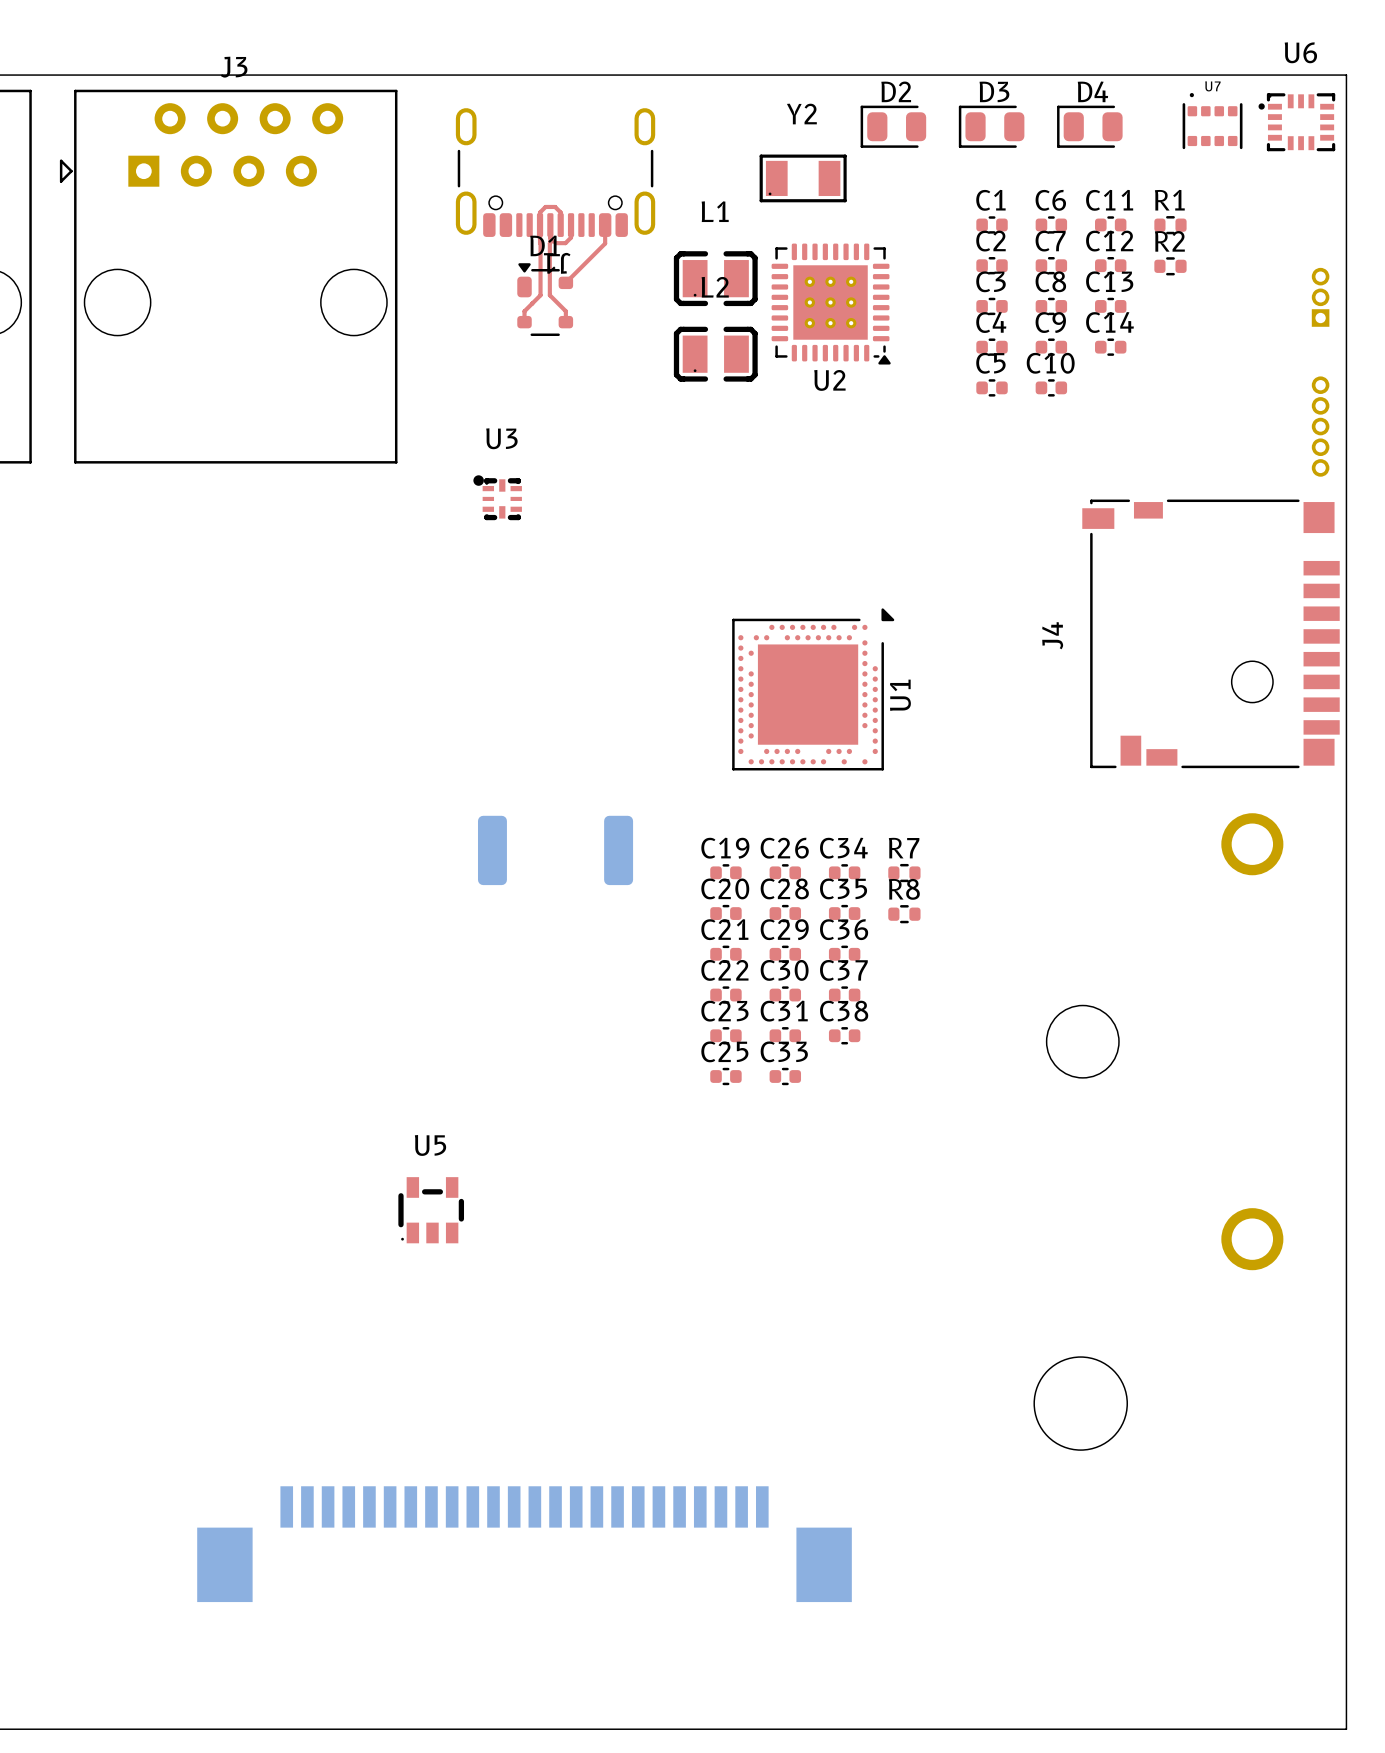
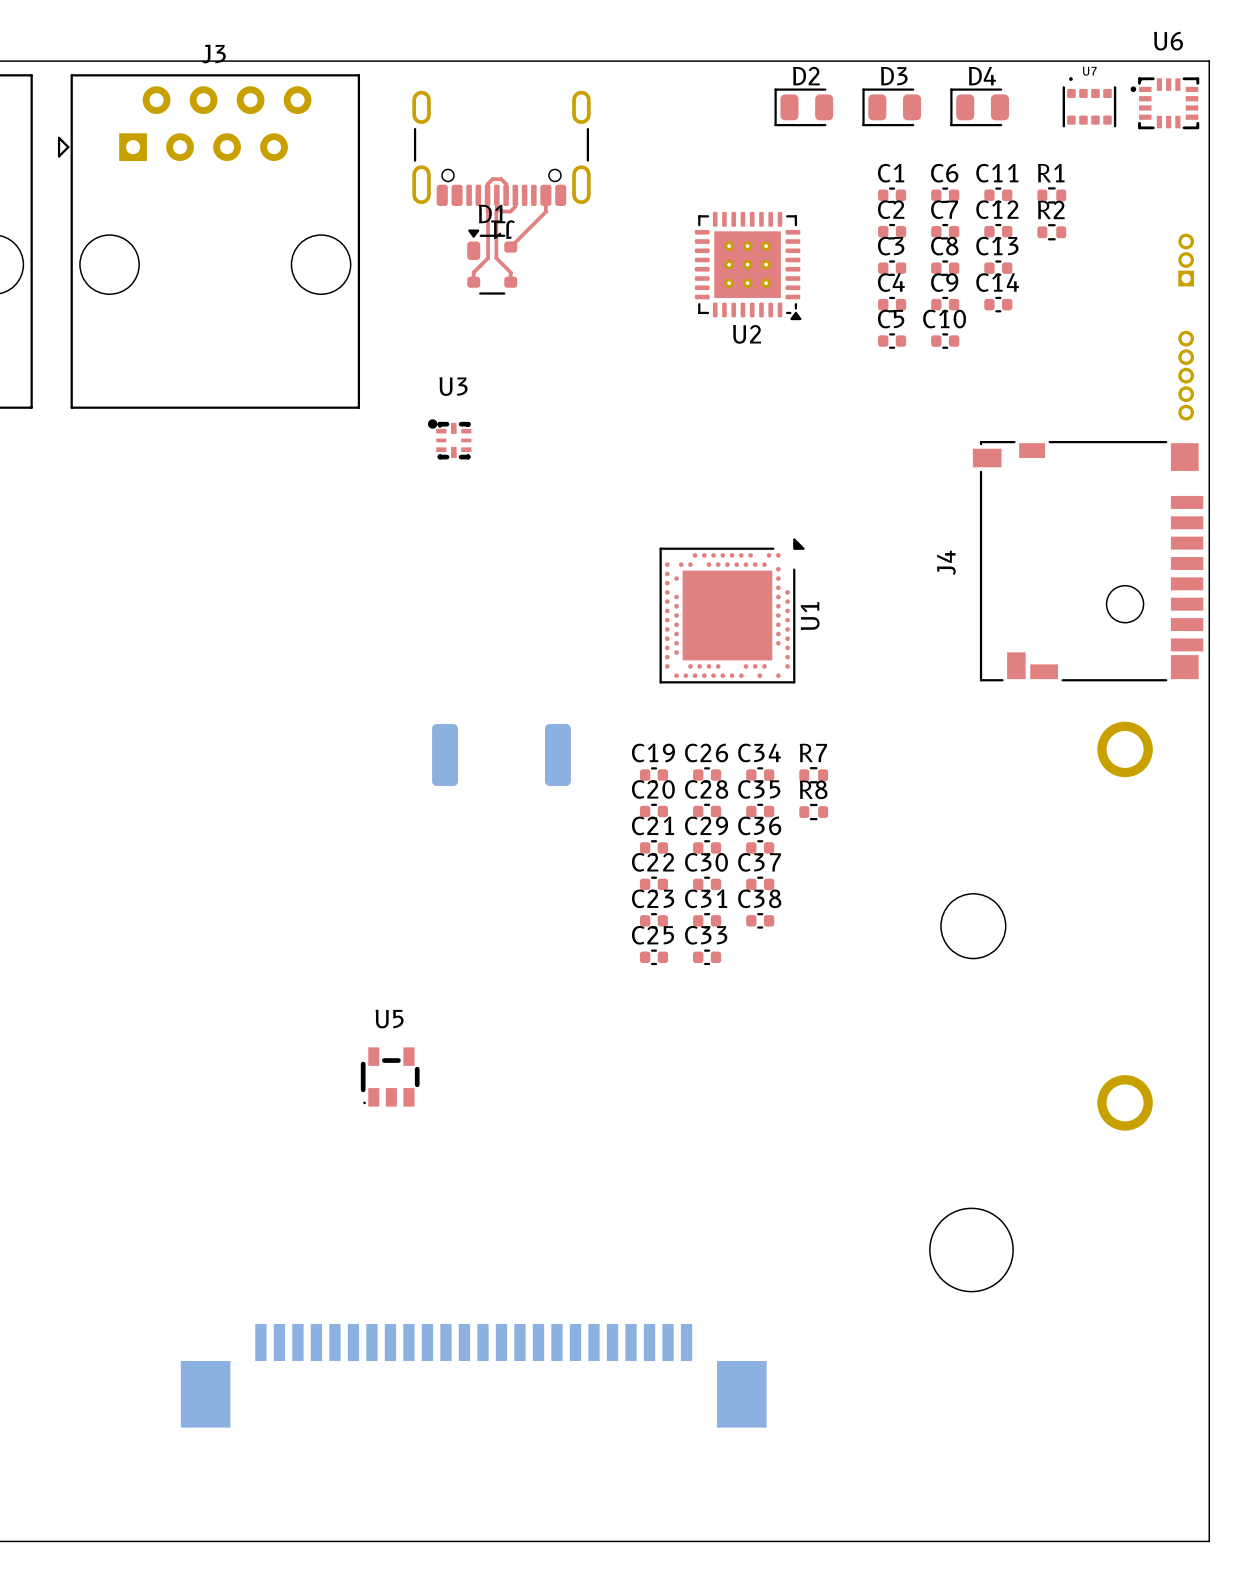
Y2: (803, 178) -> none
L1: (715, 278) -> none
L2: (715, 354) -> none

